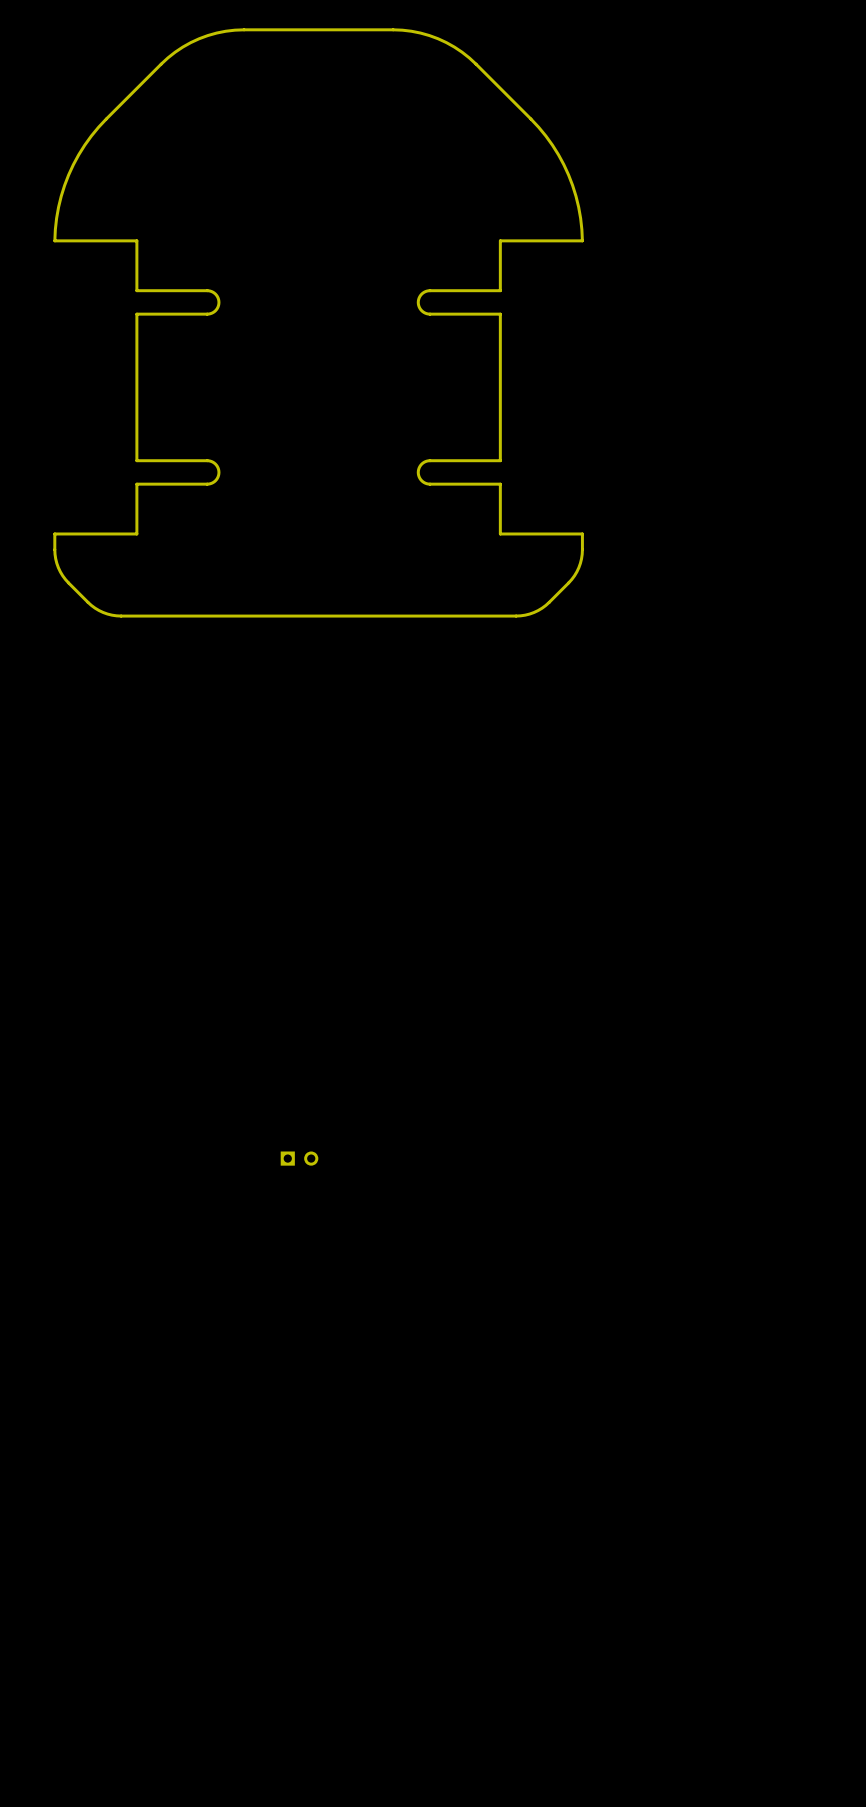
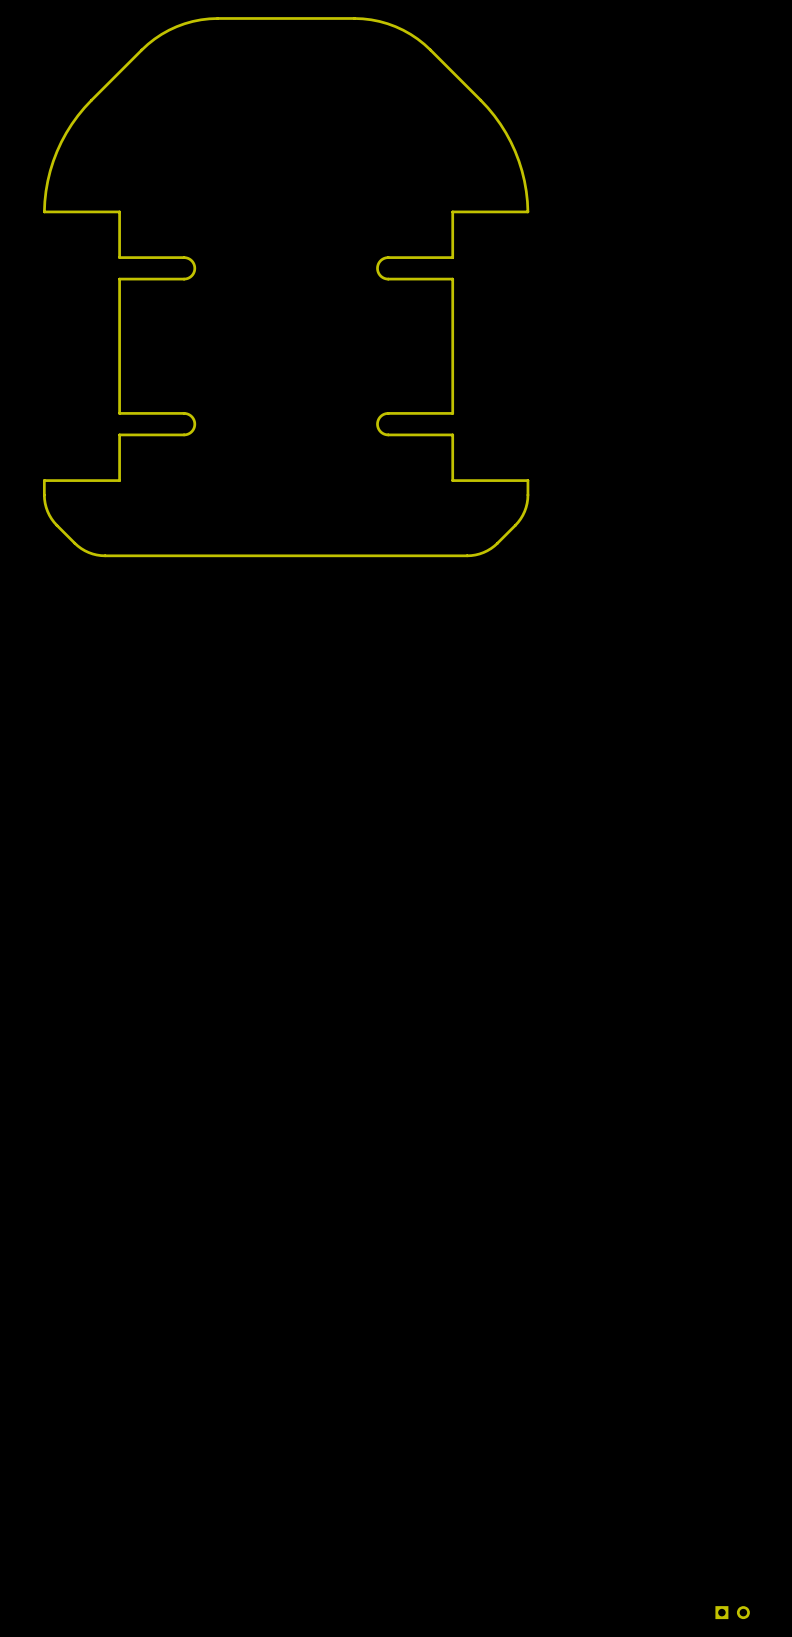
part: (299, 1158) -> none
part: none -> (732, 1612)

